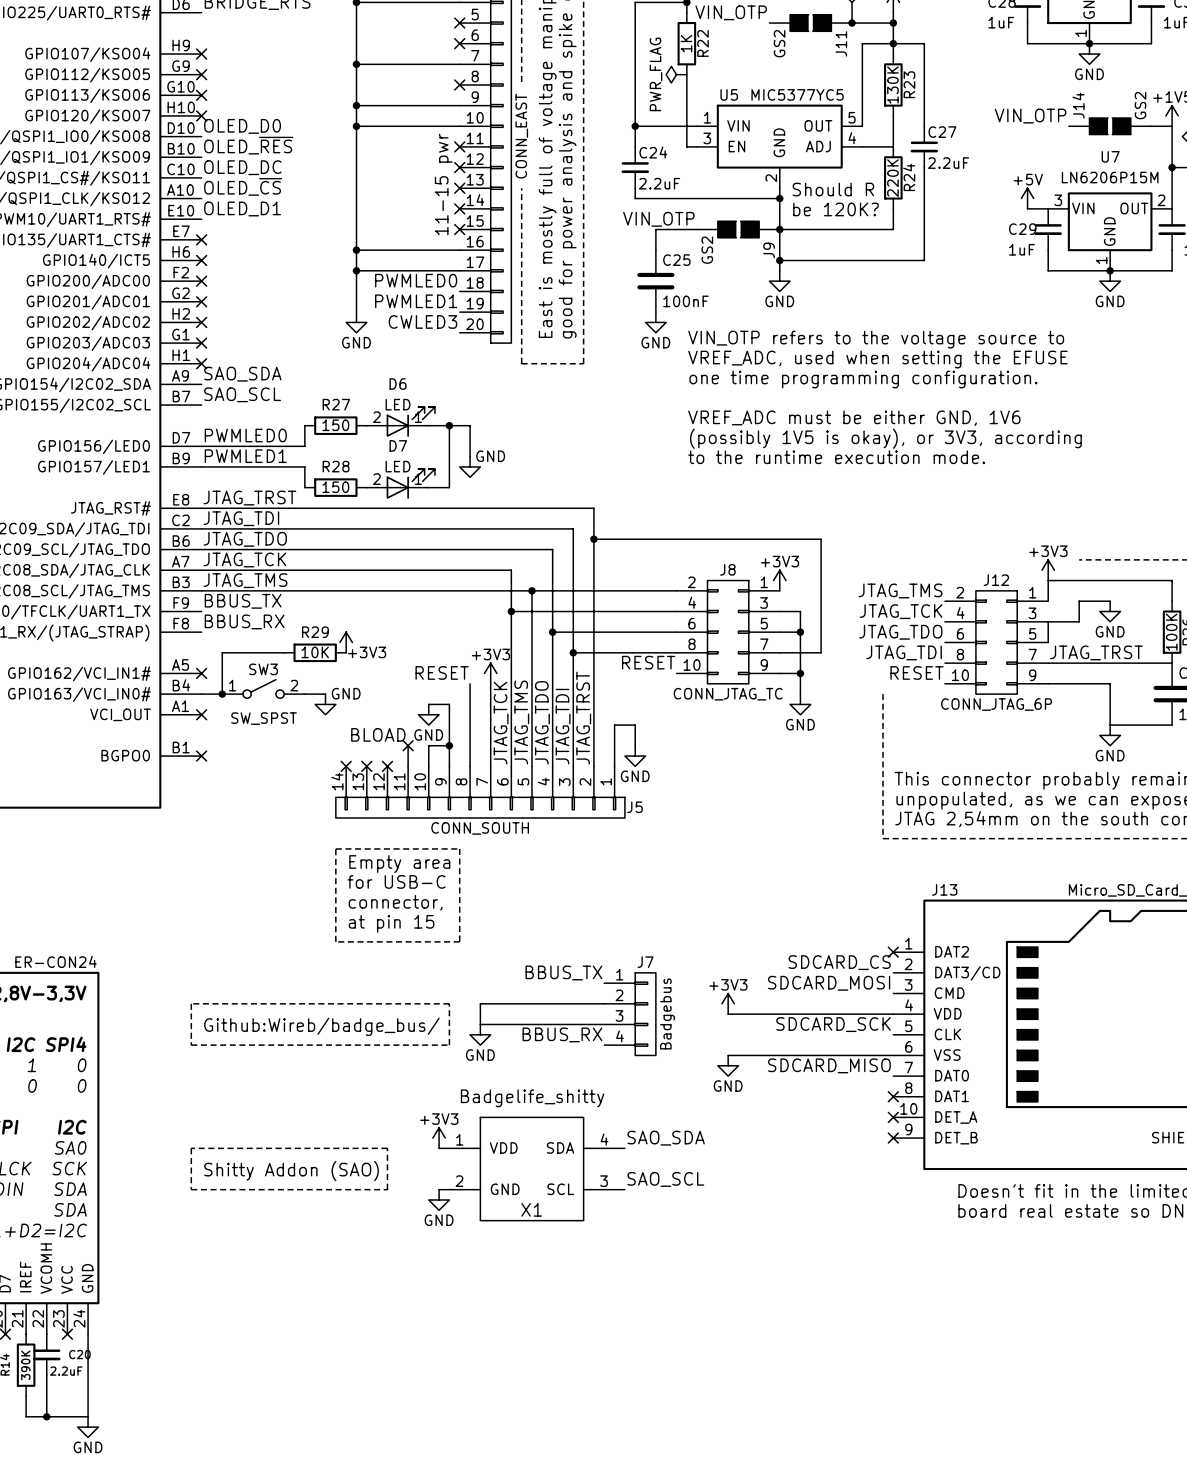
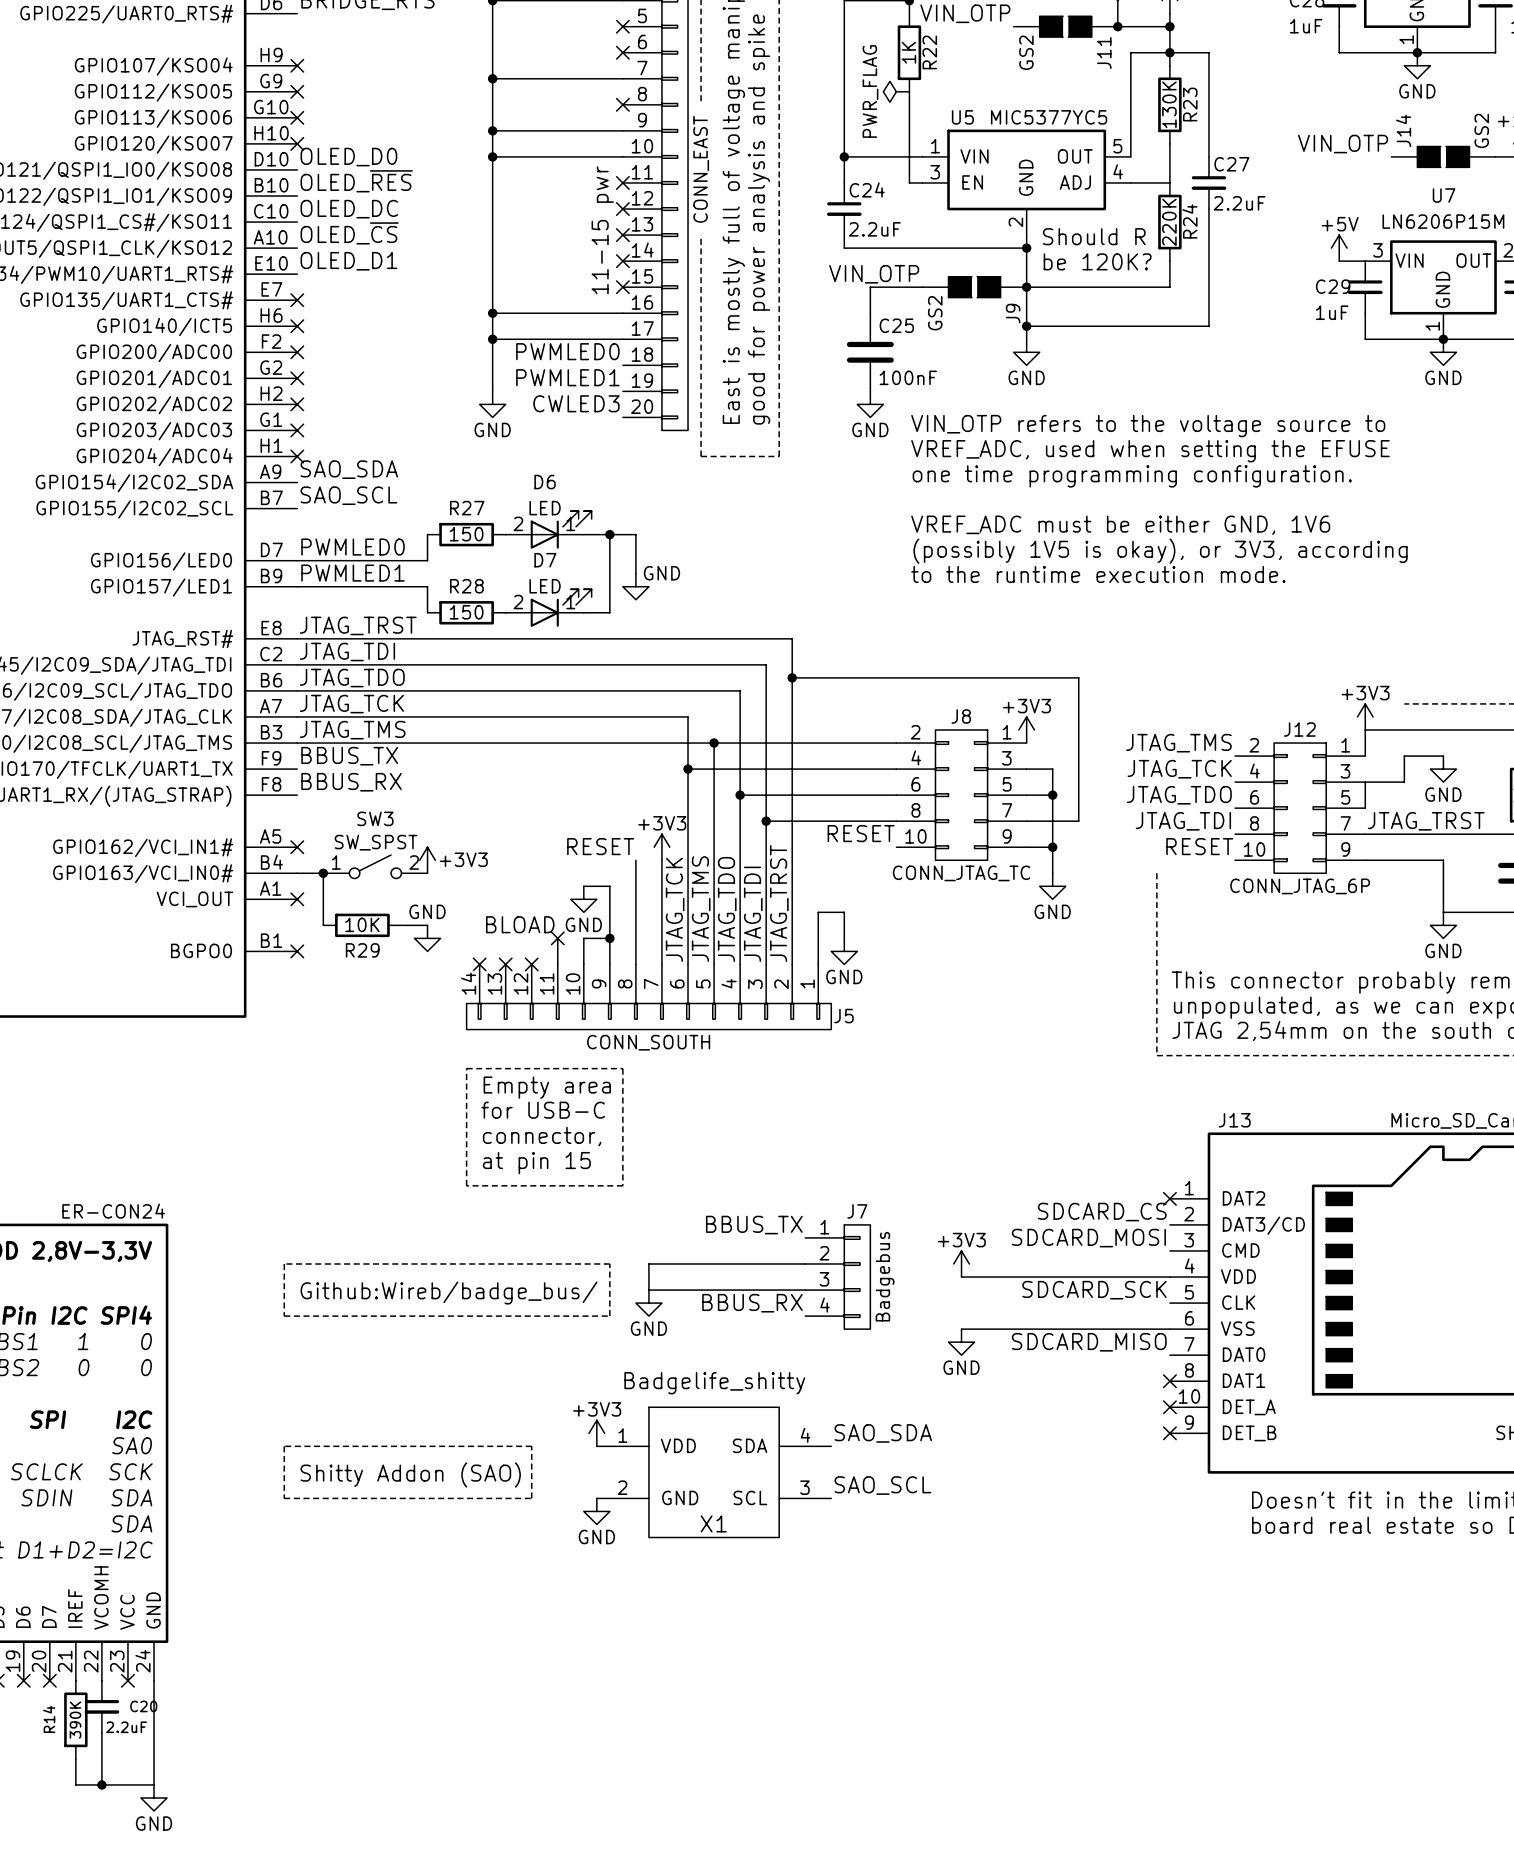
R29 name position: R29 (315, 632) -> R29 (362, 950)
power symbol position: +3V3 (346, 642) -> +3V3 (427, 860)
wire: (284, 652) (222, 652) (222, 694) -> (323, 925) (323, 873)
R29 position: (315, 652) -> (362, 925)
power symbol text position: +3V3 (367, 652) -> +3V3 (463, 859)
SW3 name position: SW3 (263, 669) -> SW3 (375, 818)
power symbol text position: GND (346, 693) -> GND (427, 911)
wire: (304, 694) (325, 694) -> (401, 925) (427, 925)
power symbol position: GND (325, 704) -> GND (427, 938)
SW3 value position: SW_SPST (264, 718) -> SW_SPST (376, 842)

